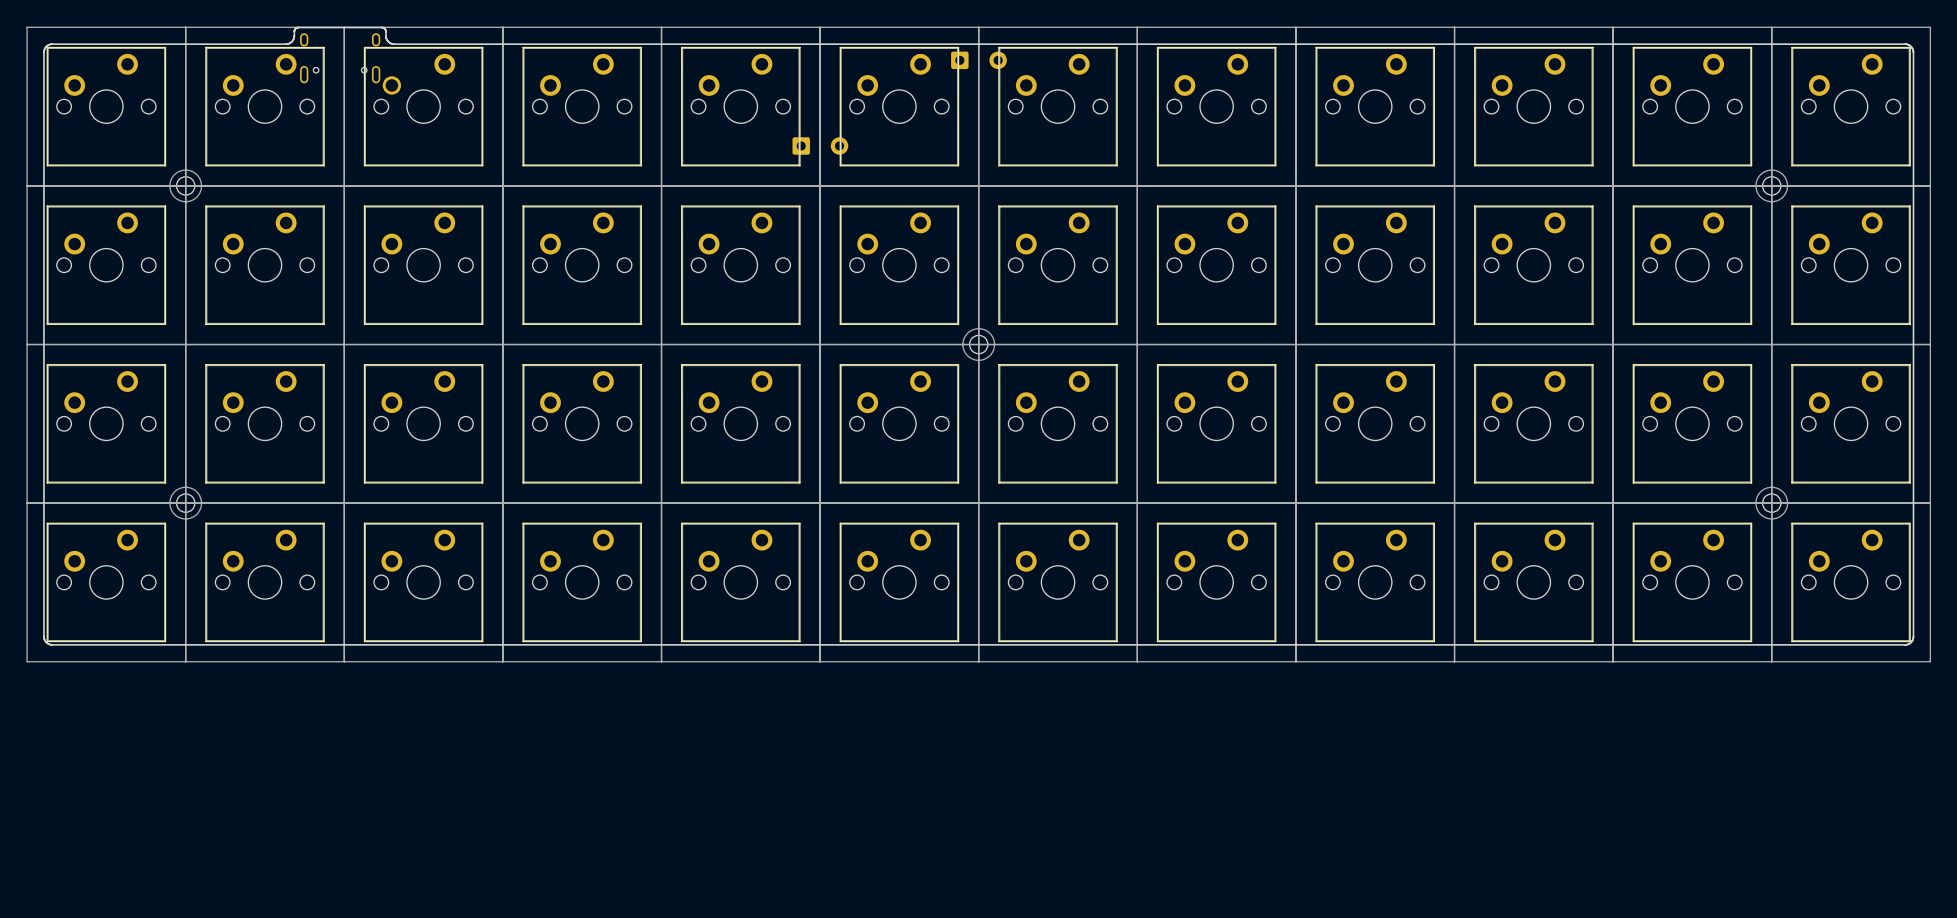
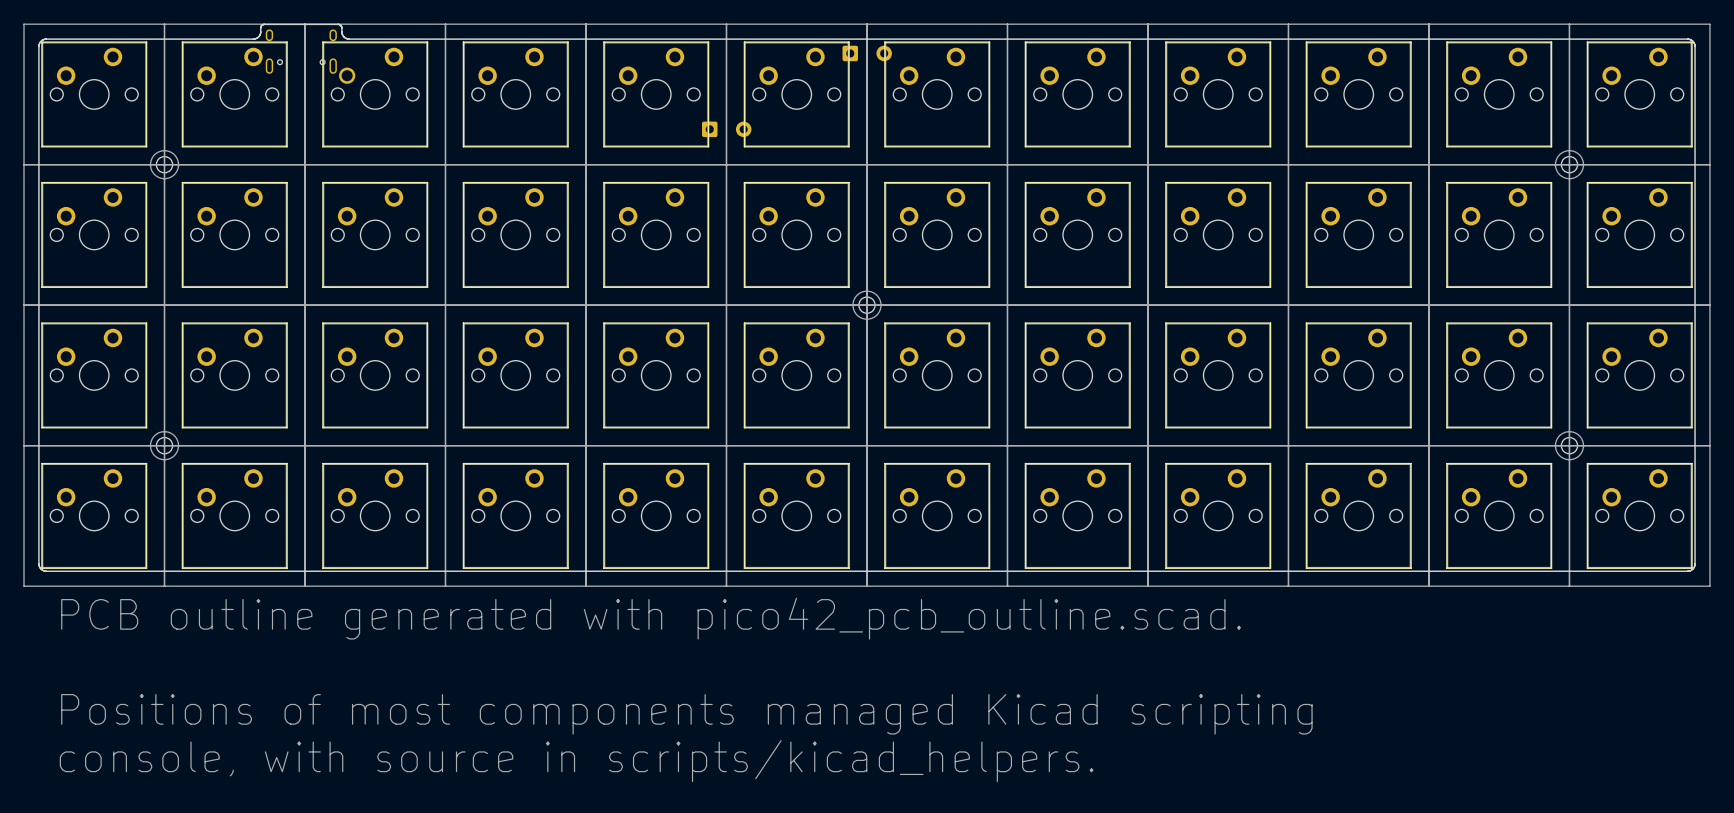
text: none -> PCB outline generated with pico42_pcb_outline.scad. (651, 618)
text: none -> Positions of most components managed Kicad scripting (686, 714)
text: none -> console, with source in scripts/kicad_helpers. (576, 761)

